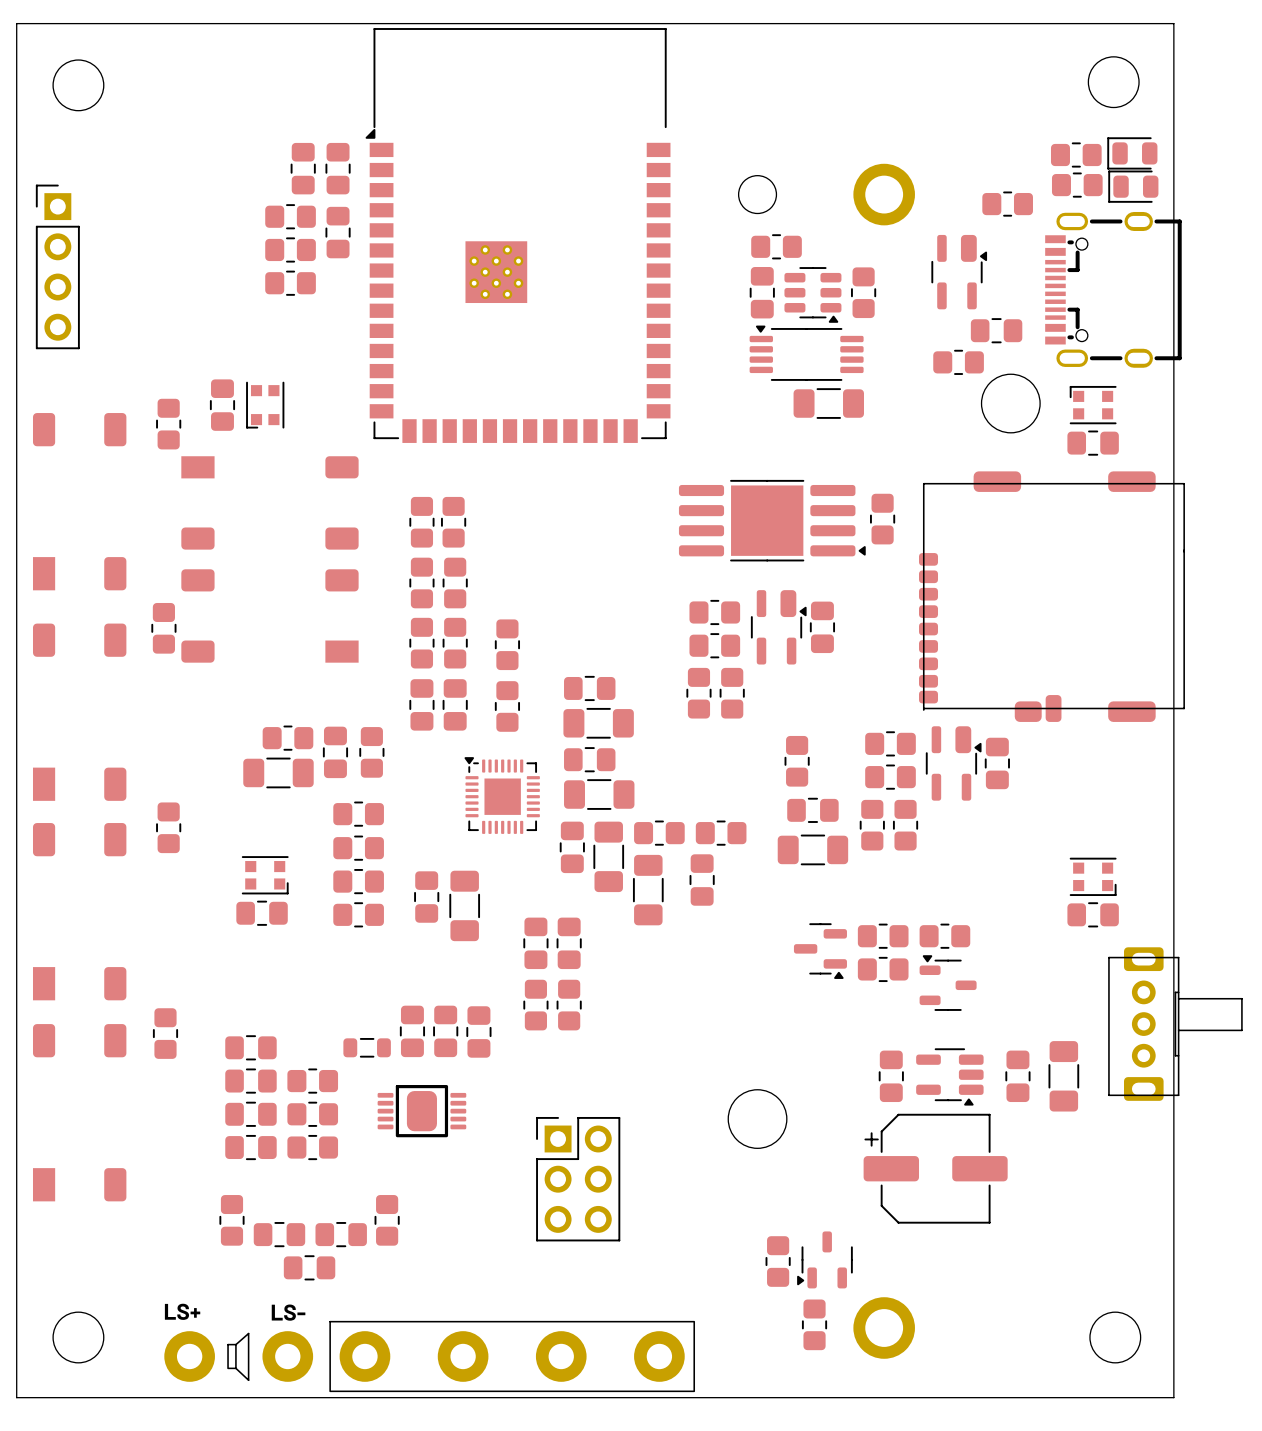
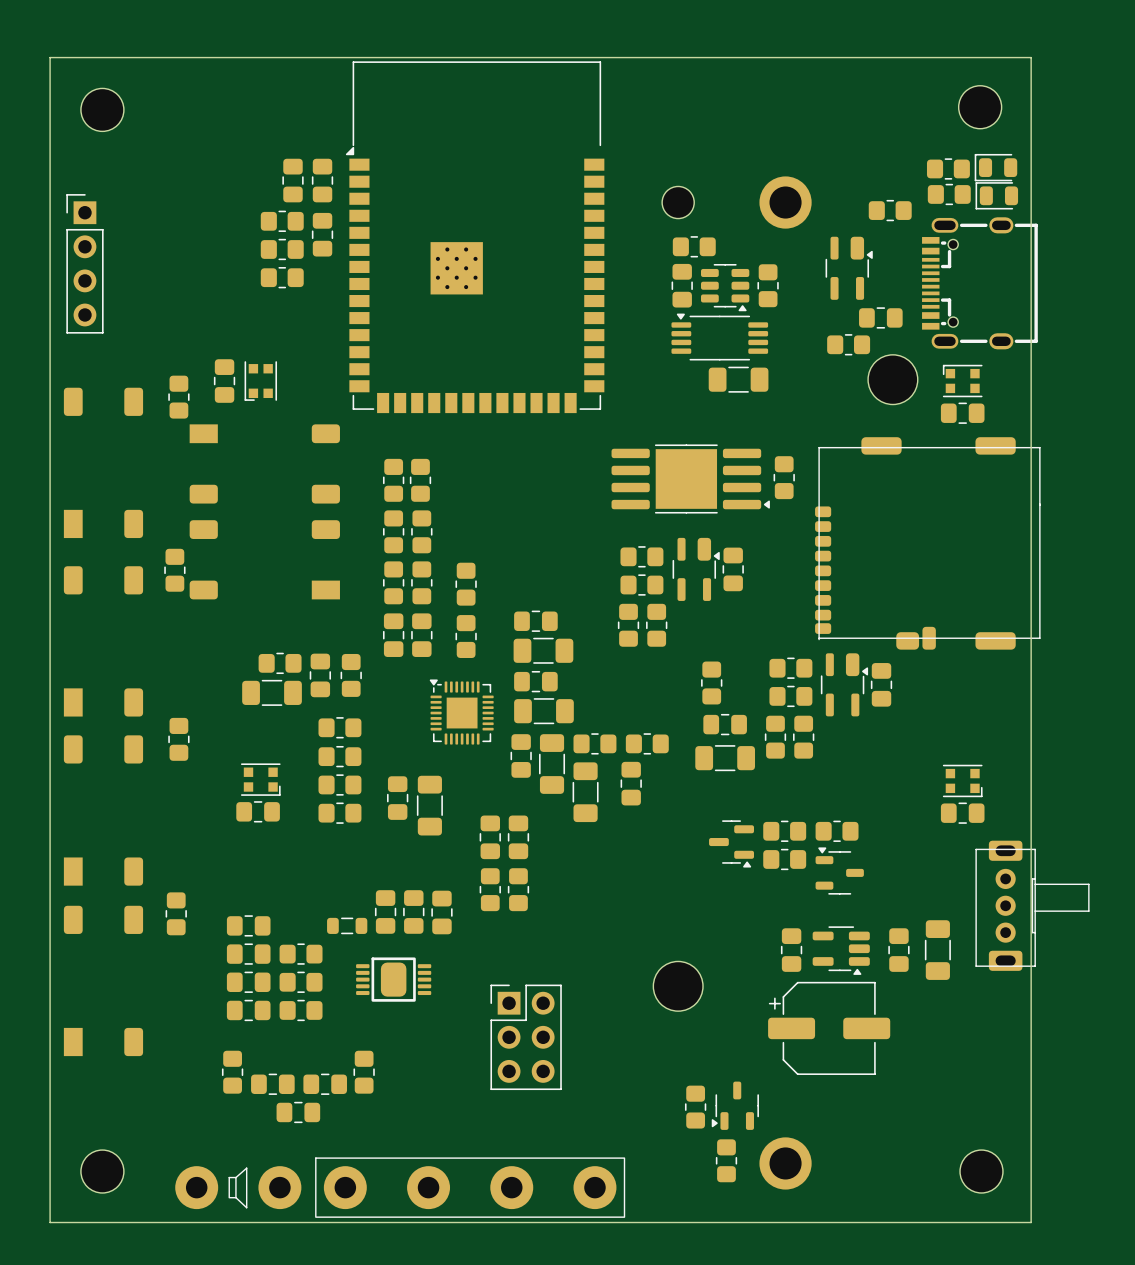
part text: LS+ (182, 1311) -> none
part text: LS- (288, 1312) -> none

